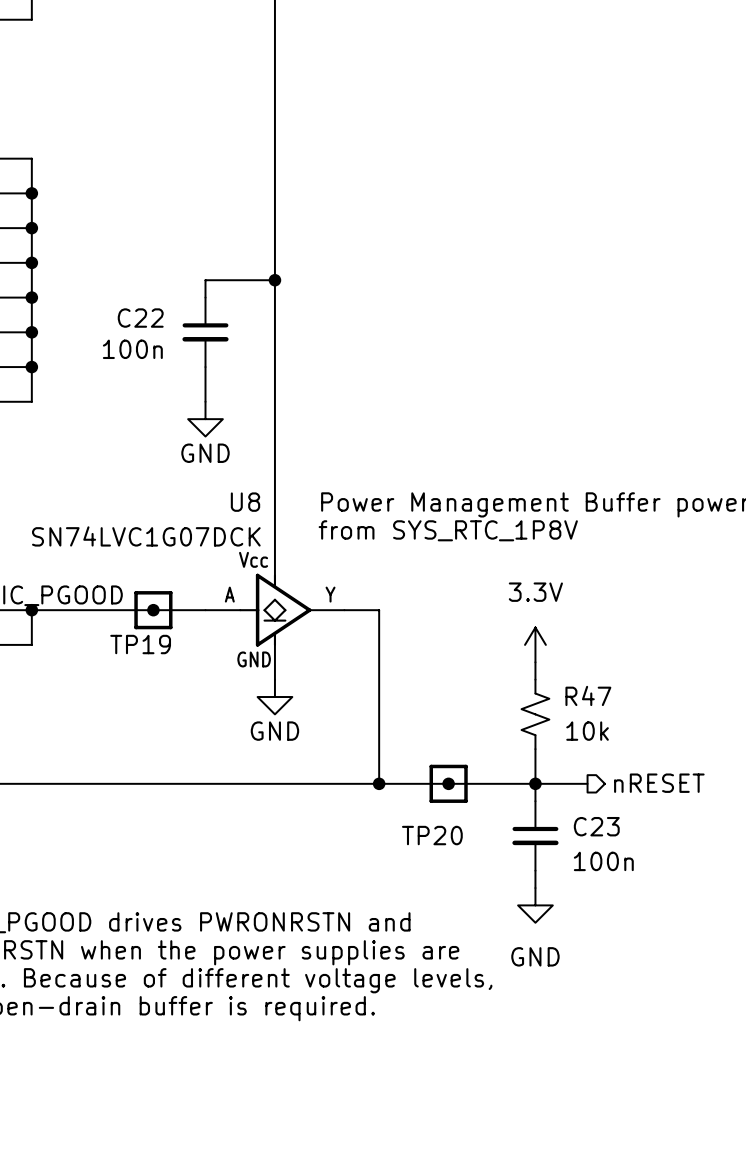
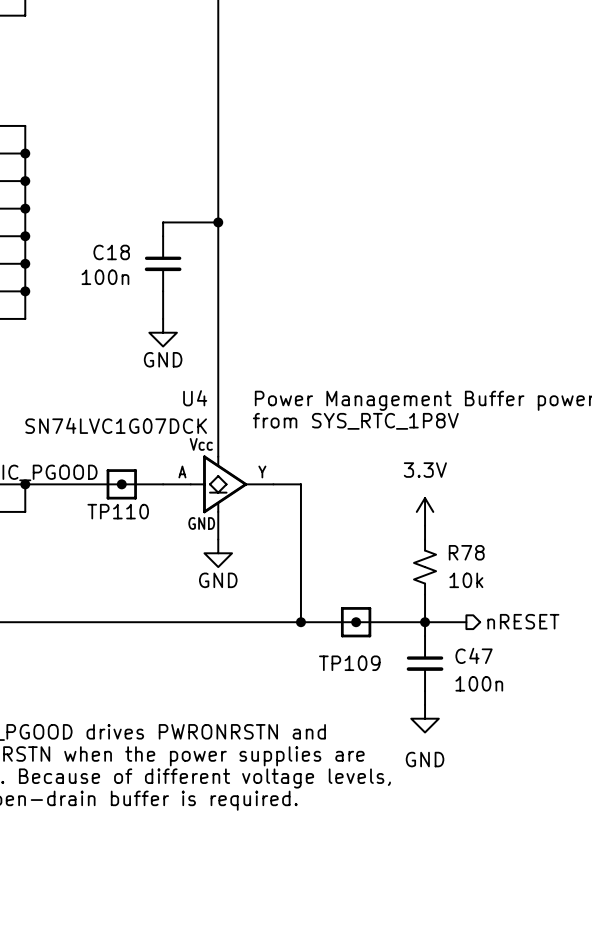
C22 name: C22 (140, 318) -> C18 (111, 252)
U8 name: U8 (245, 502) -> U4 (195, 398)
TP19 name: TP19 (140, 644) -> TP110 (118, 511)
R47 name: R47 (588, 695) -> R78 (466, 552)
C23 name: C23 (596, 826) -> C47 (474, 655)
TP20 name: TP20 (432, 835) -> TP109 (349, 663)

